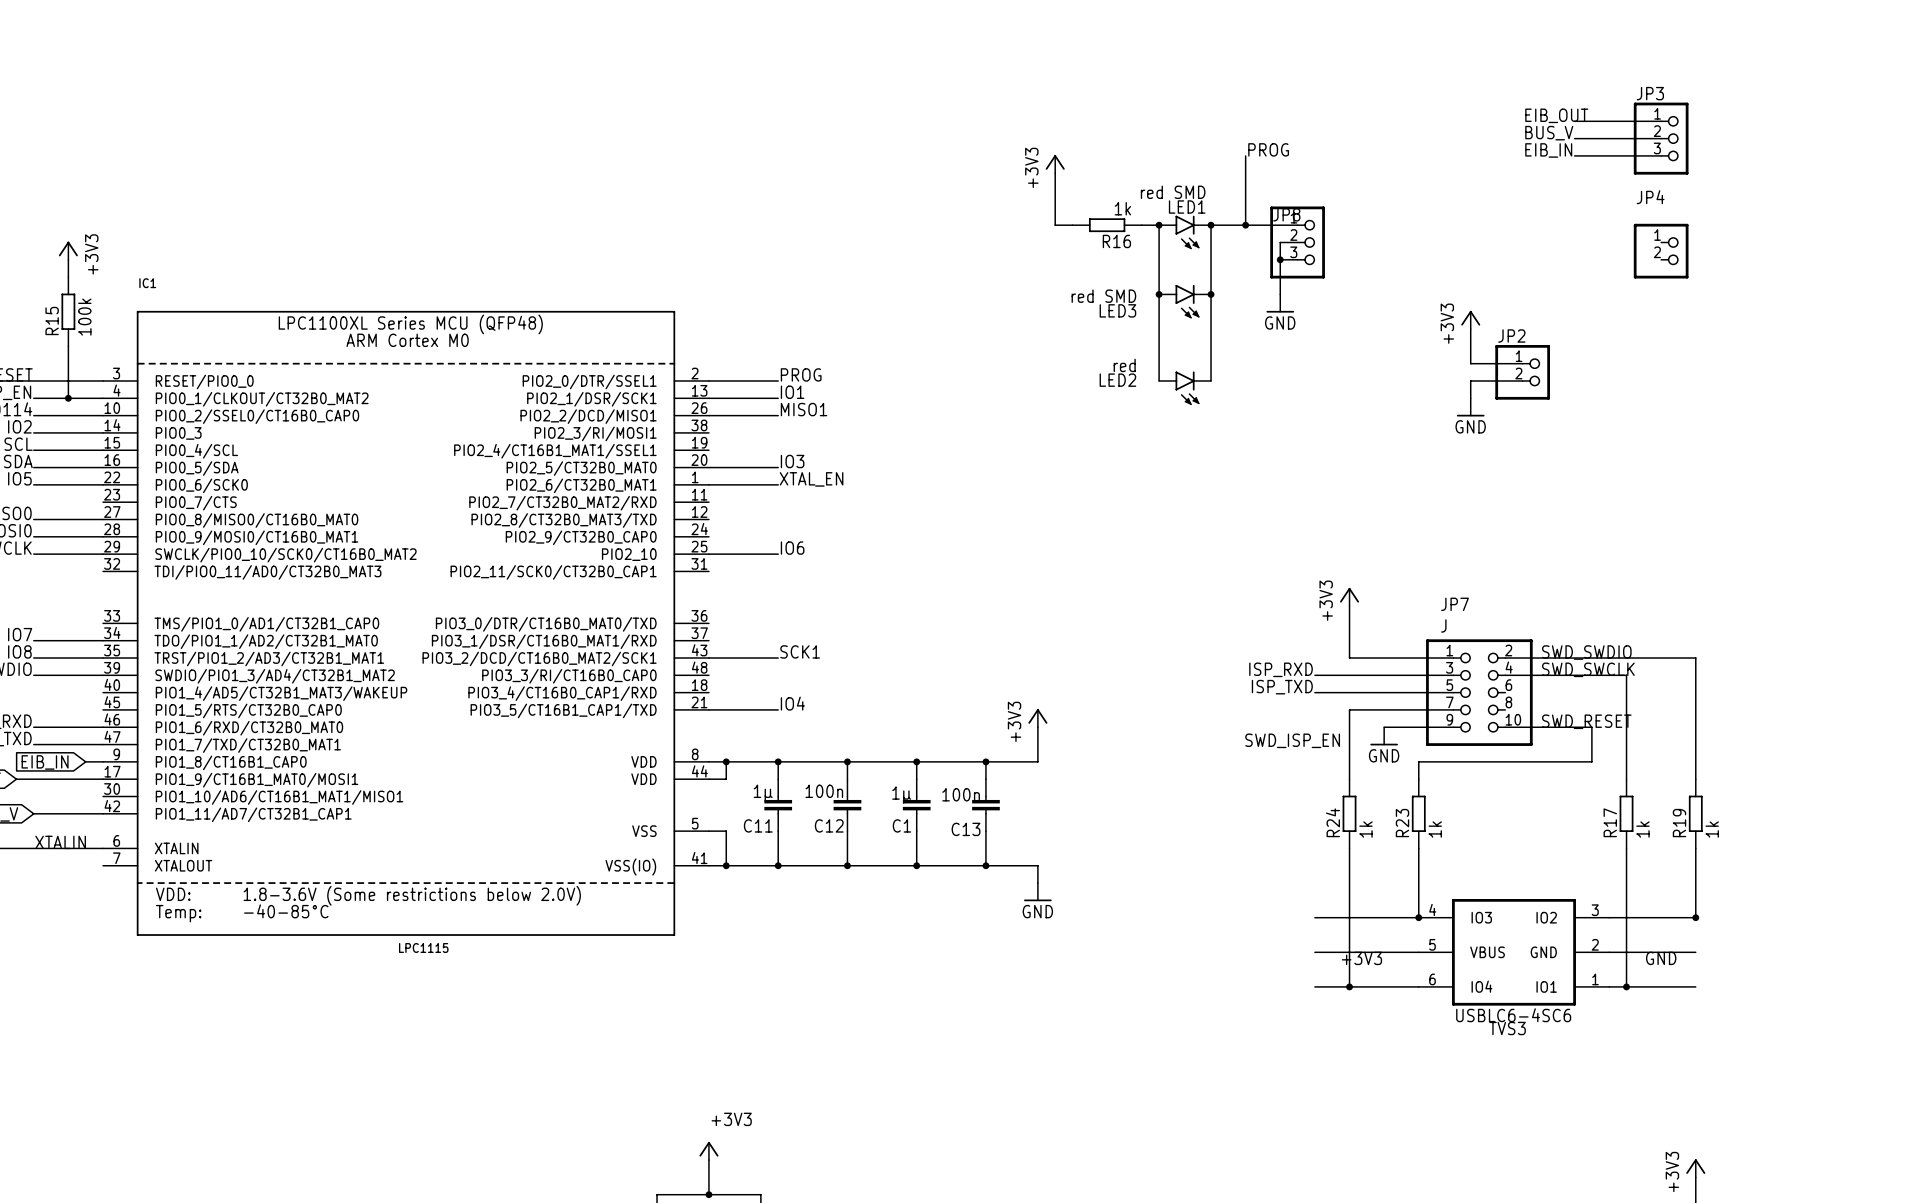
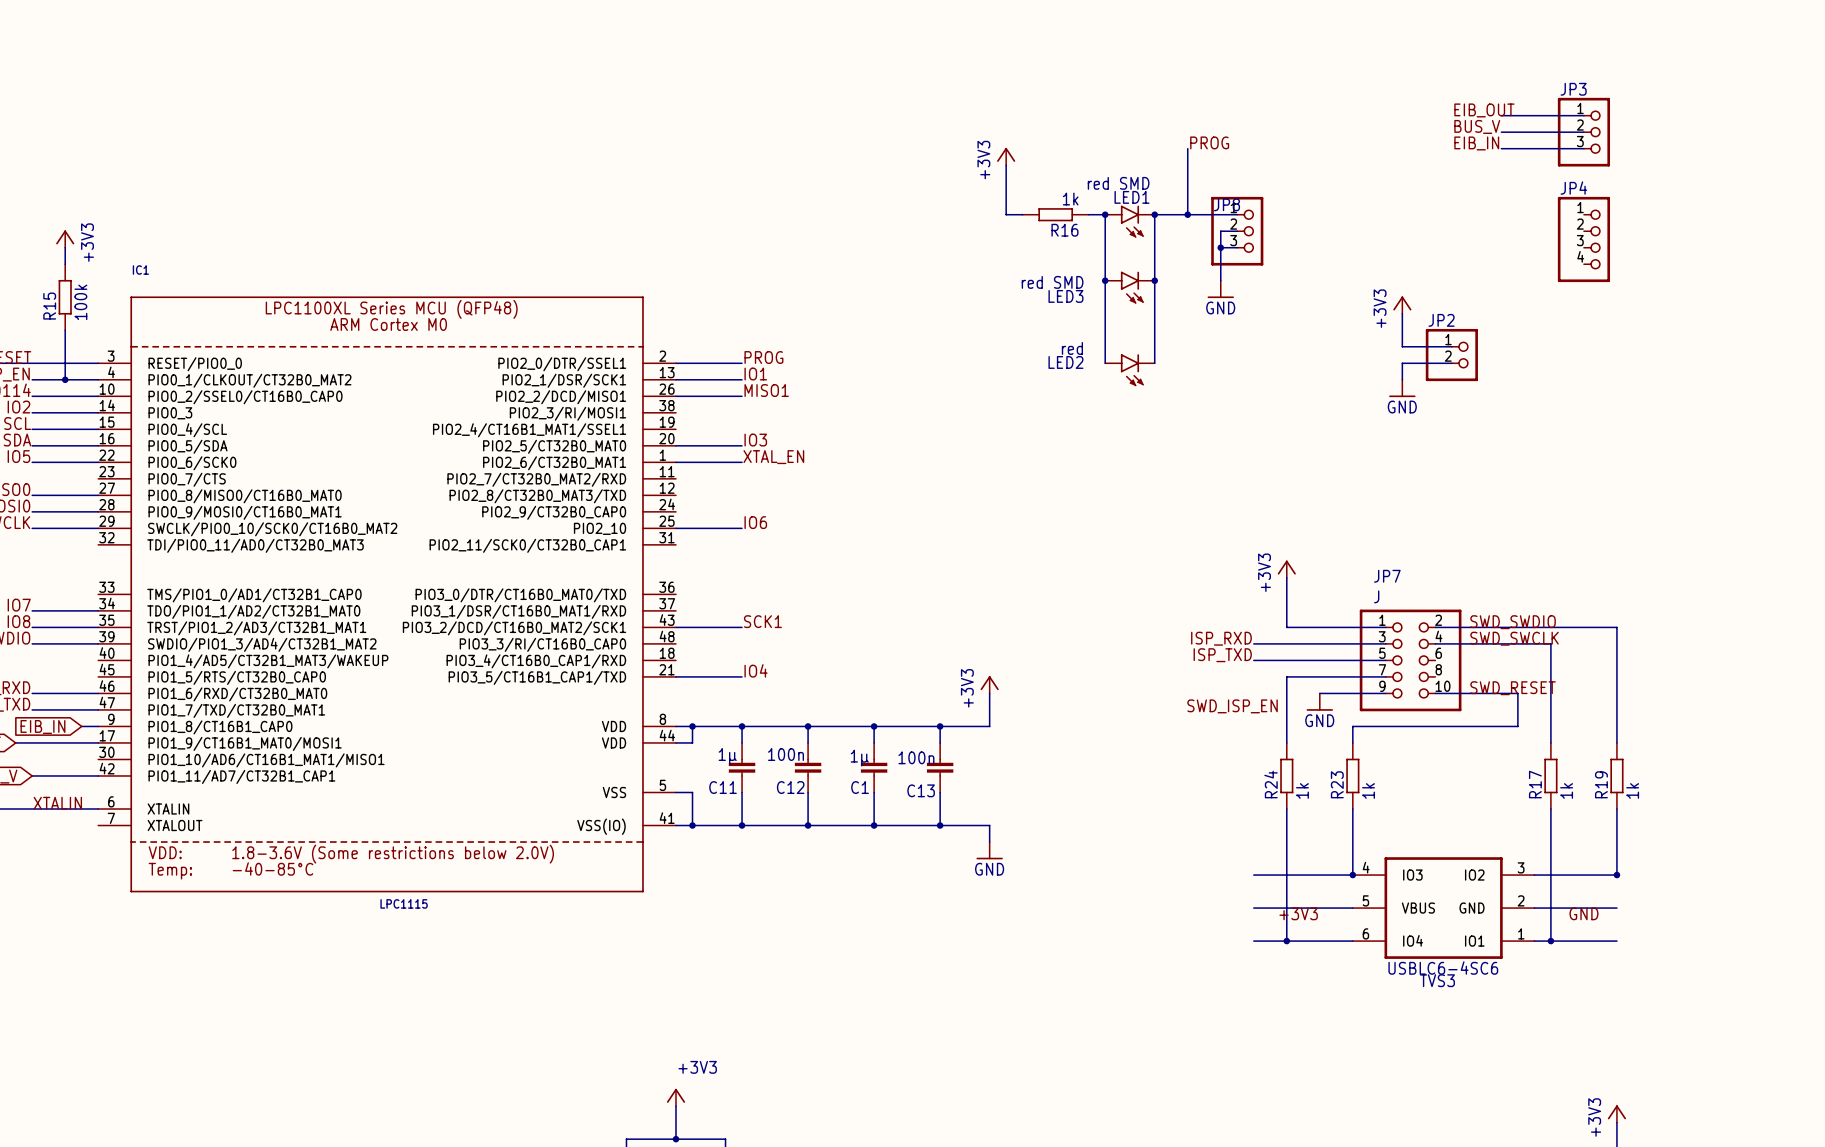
JP4 symbol: [1633, 223, 1689, 279] -> [1557, 196, 1611, 283]

